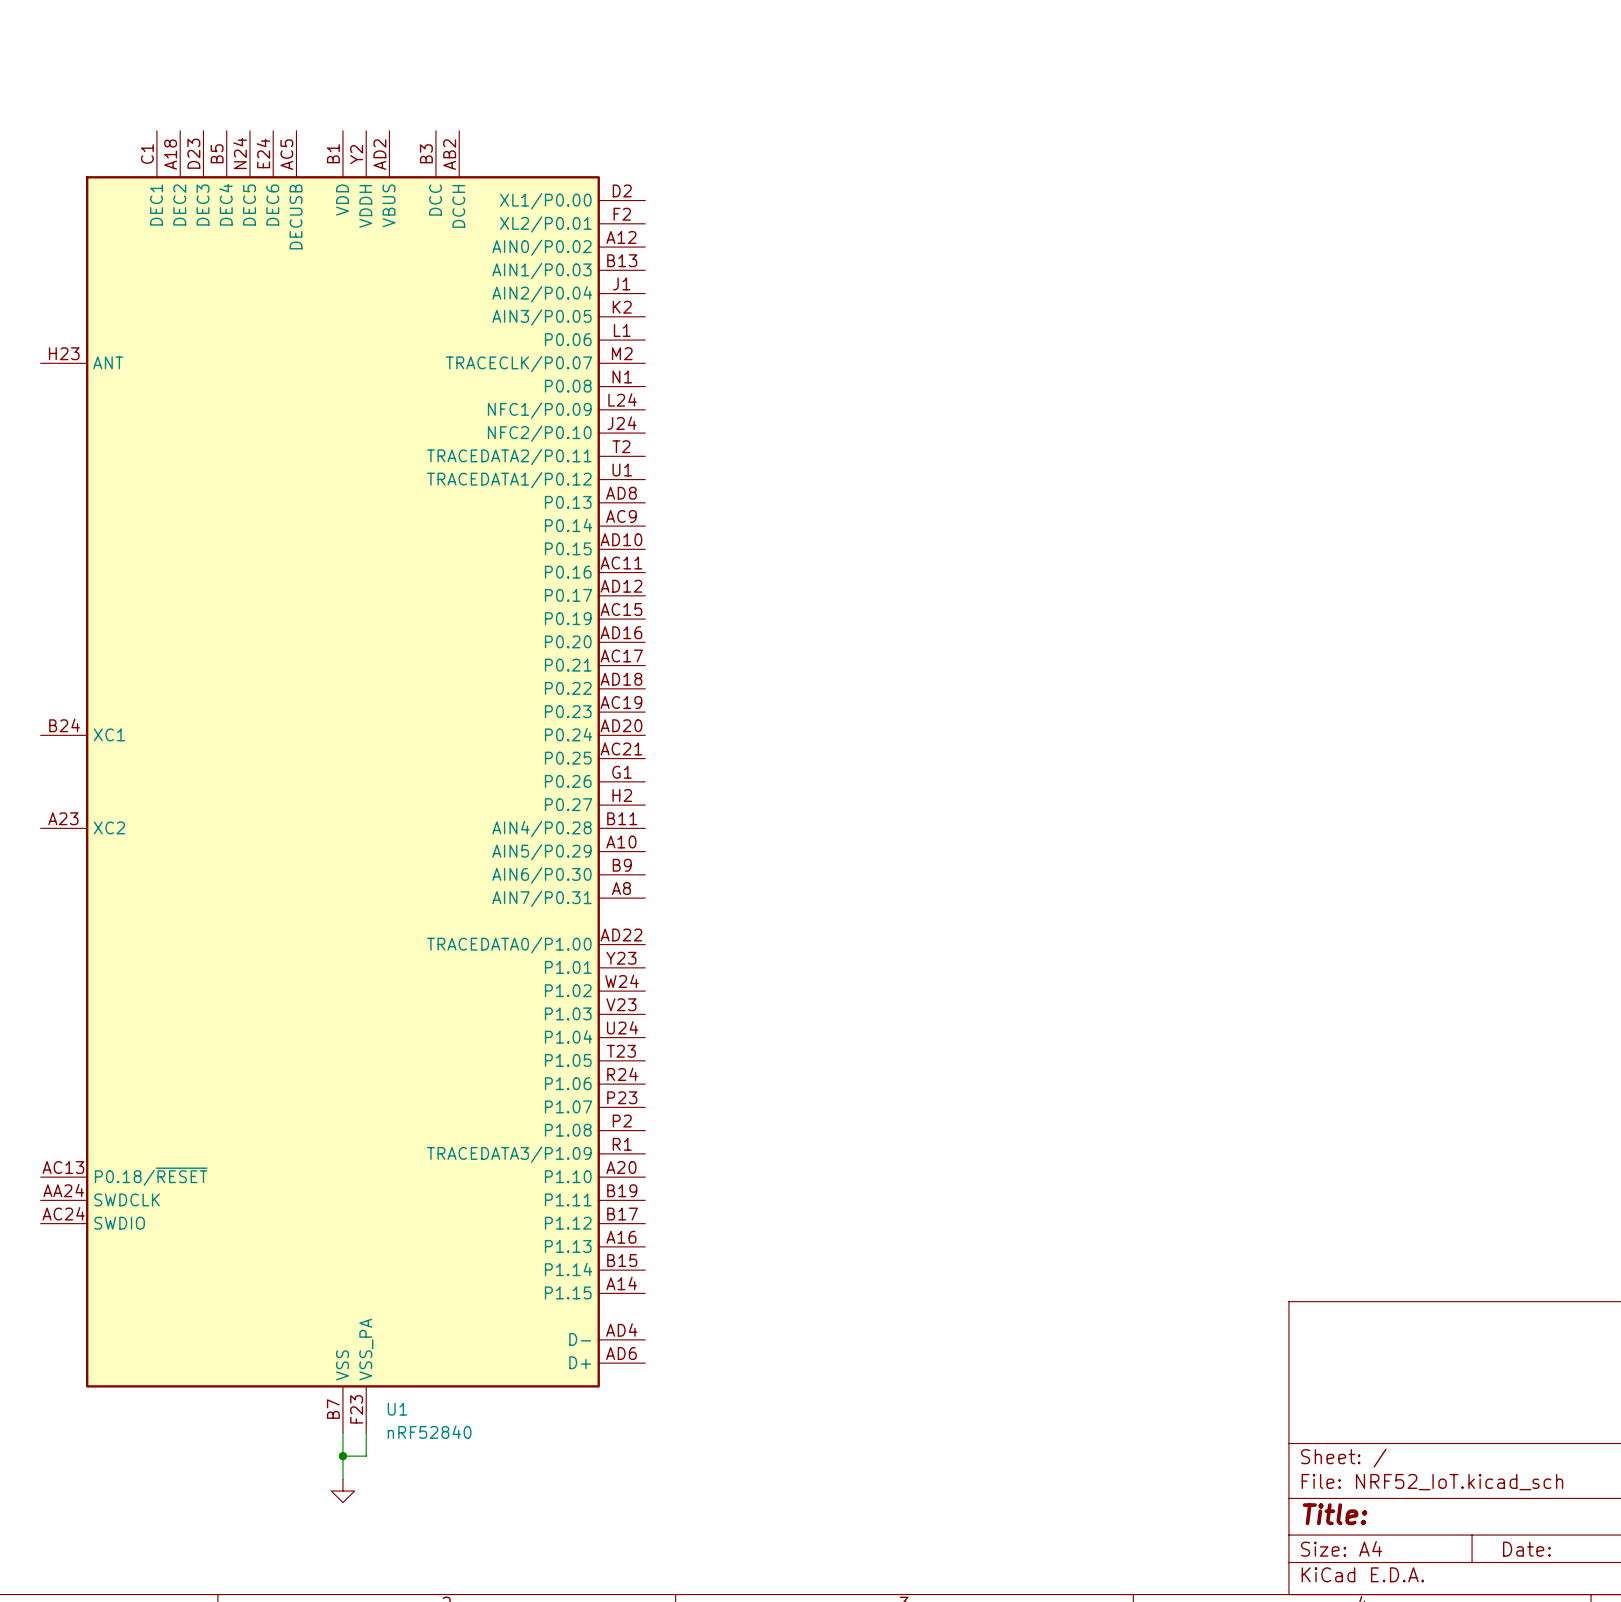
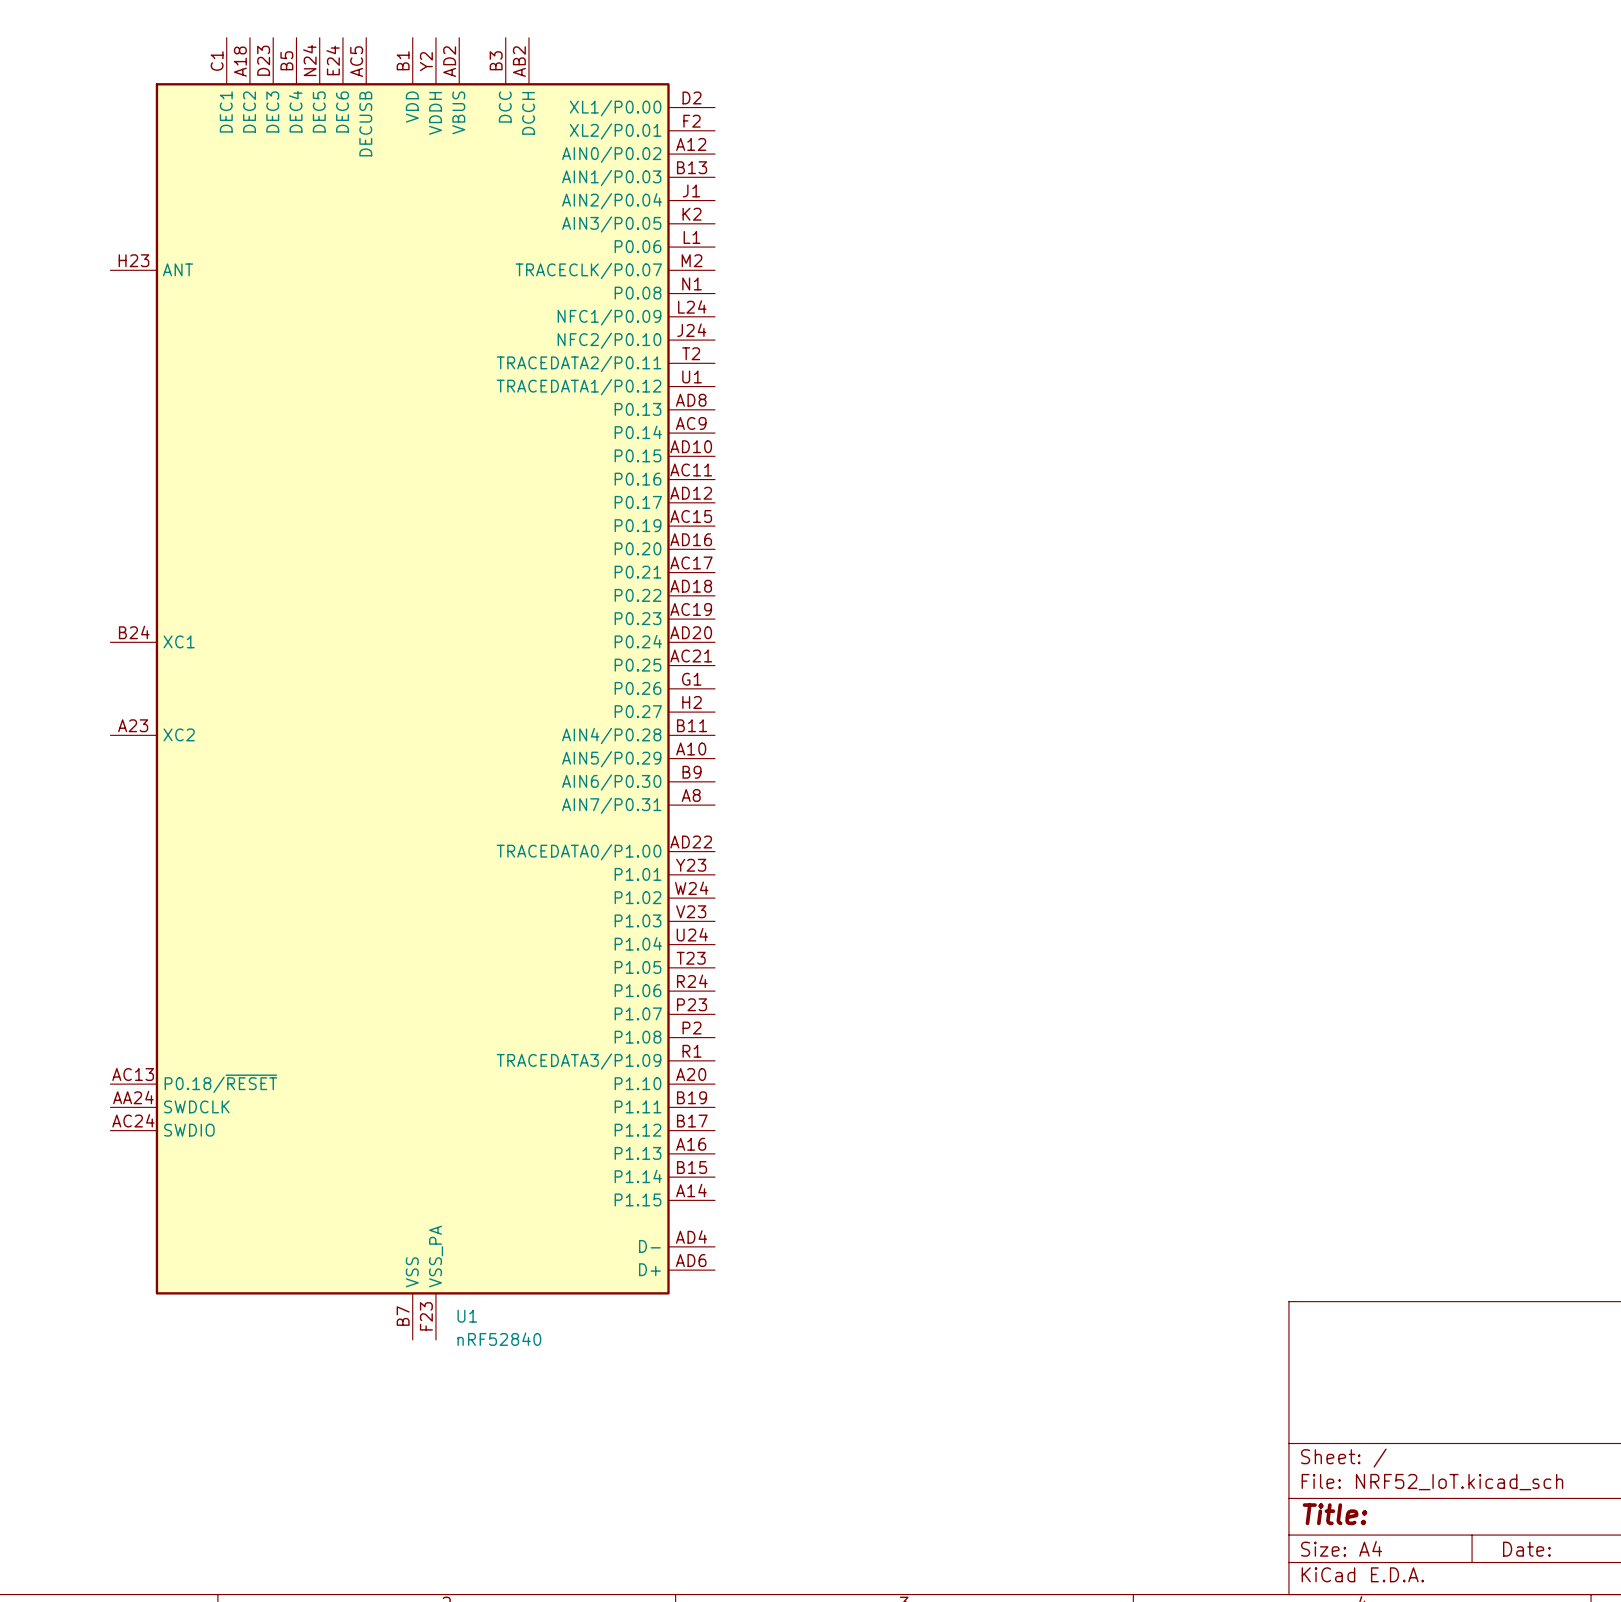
U1 position: (342, 781) -> (412, 688)
wire: (342, 1432) (342, 1479) -> none
wire: (366, 1432) (366, 1456) (342, 1456) -> none
junction: (342, 1456) -> none
power symbol: (342, 1491) -> none

